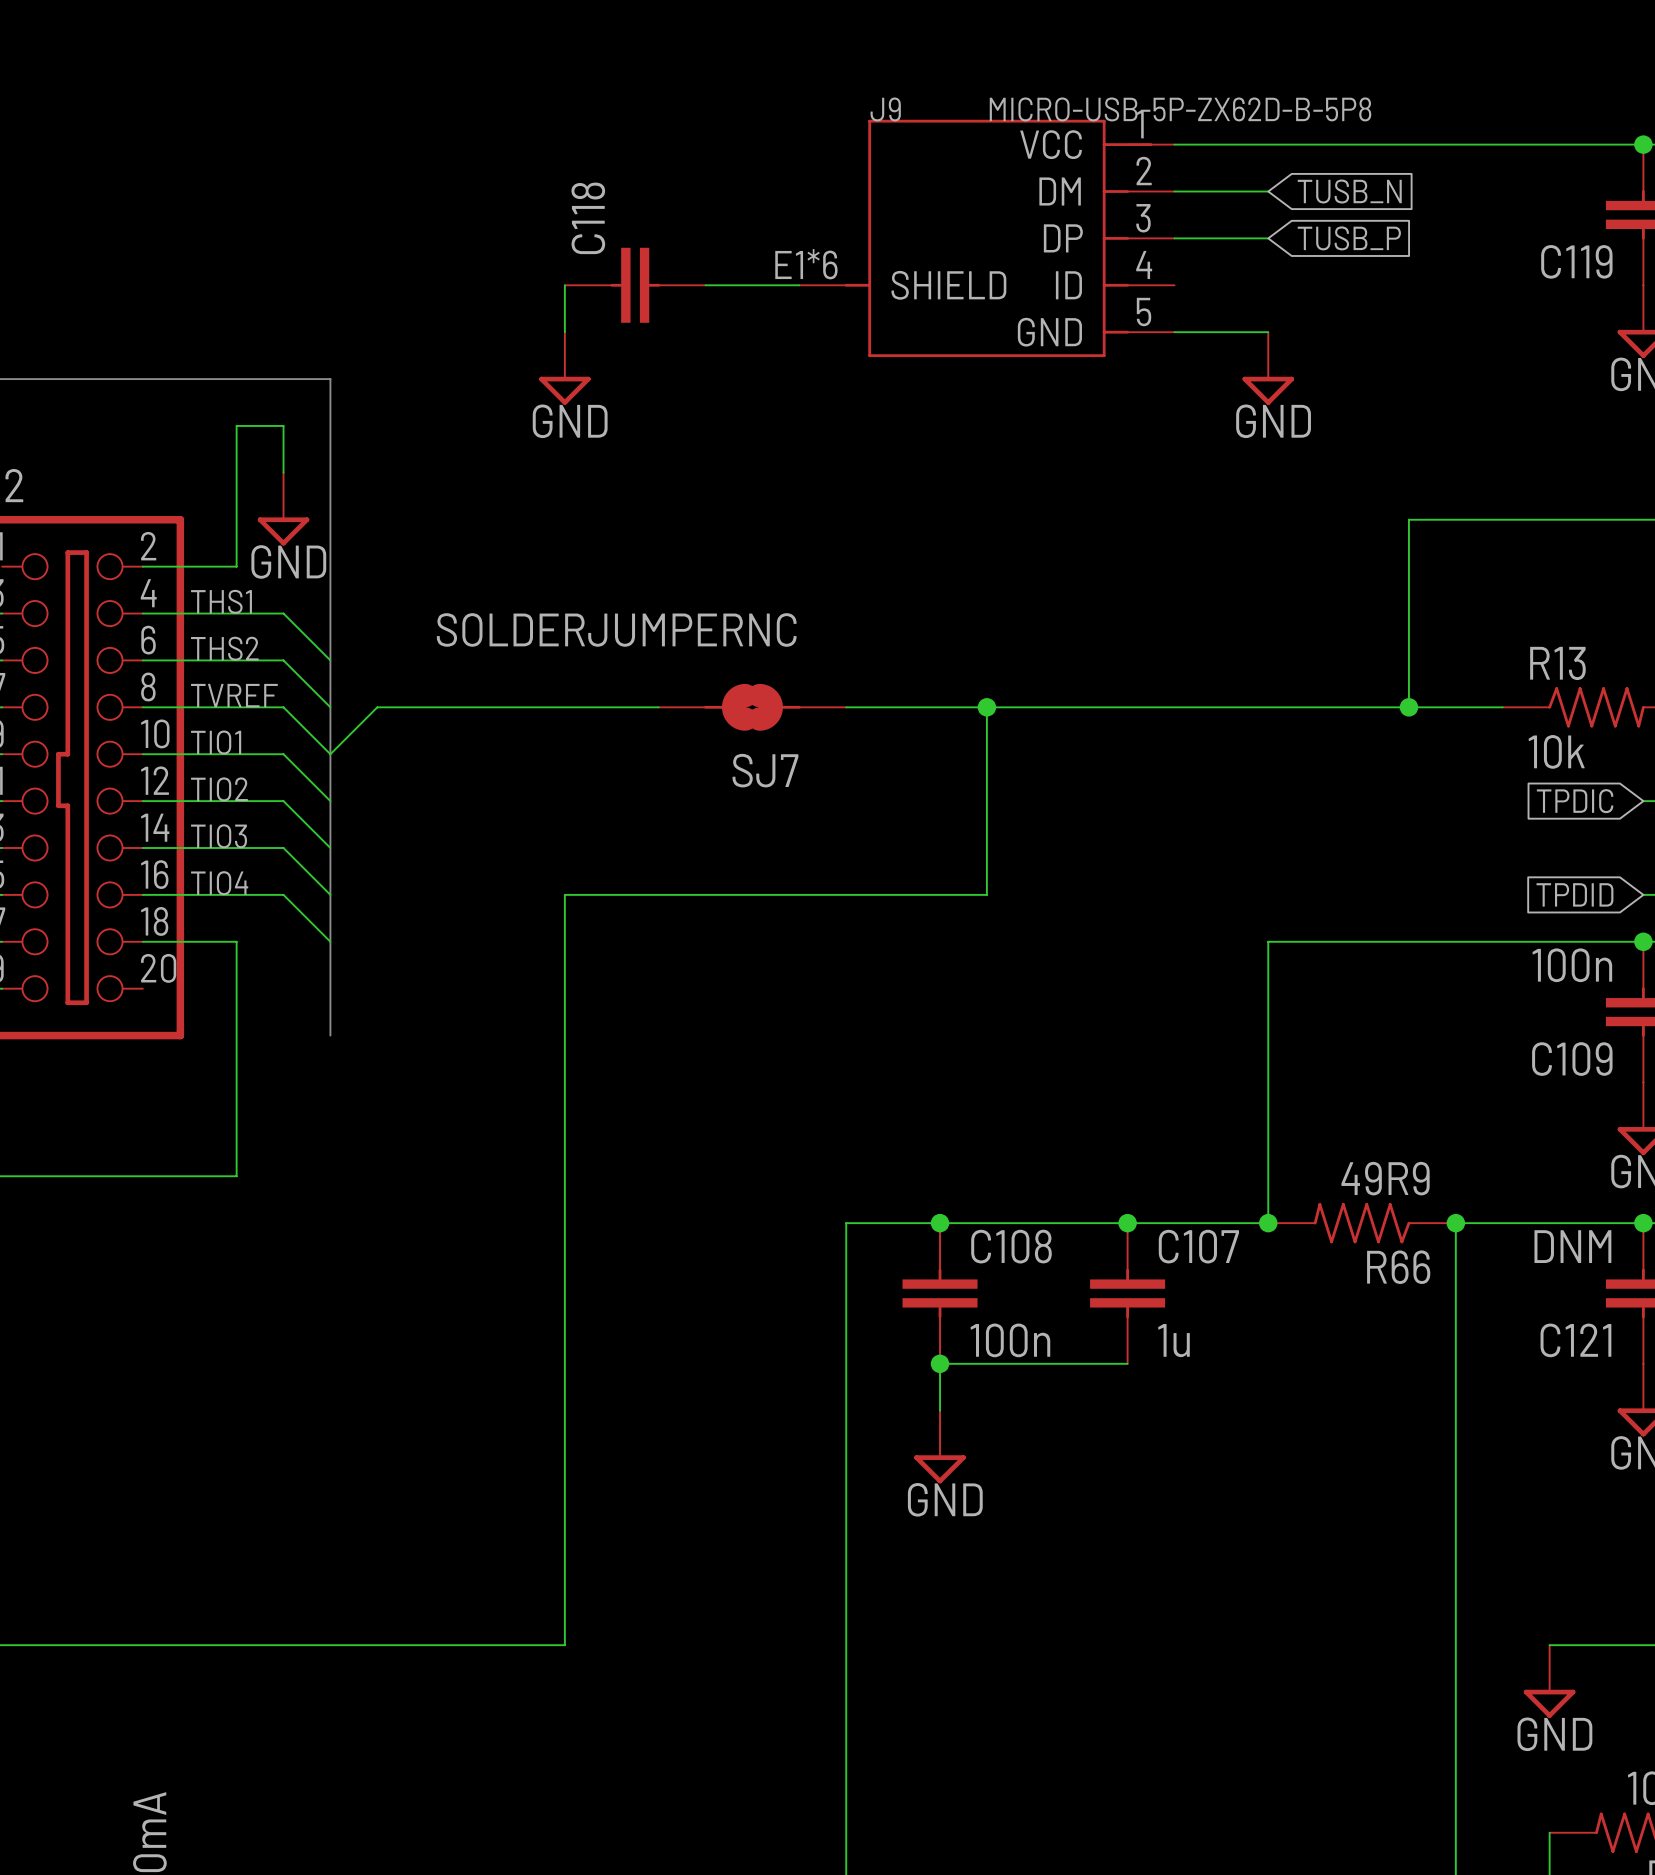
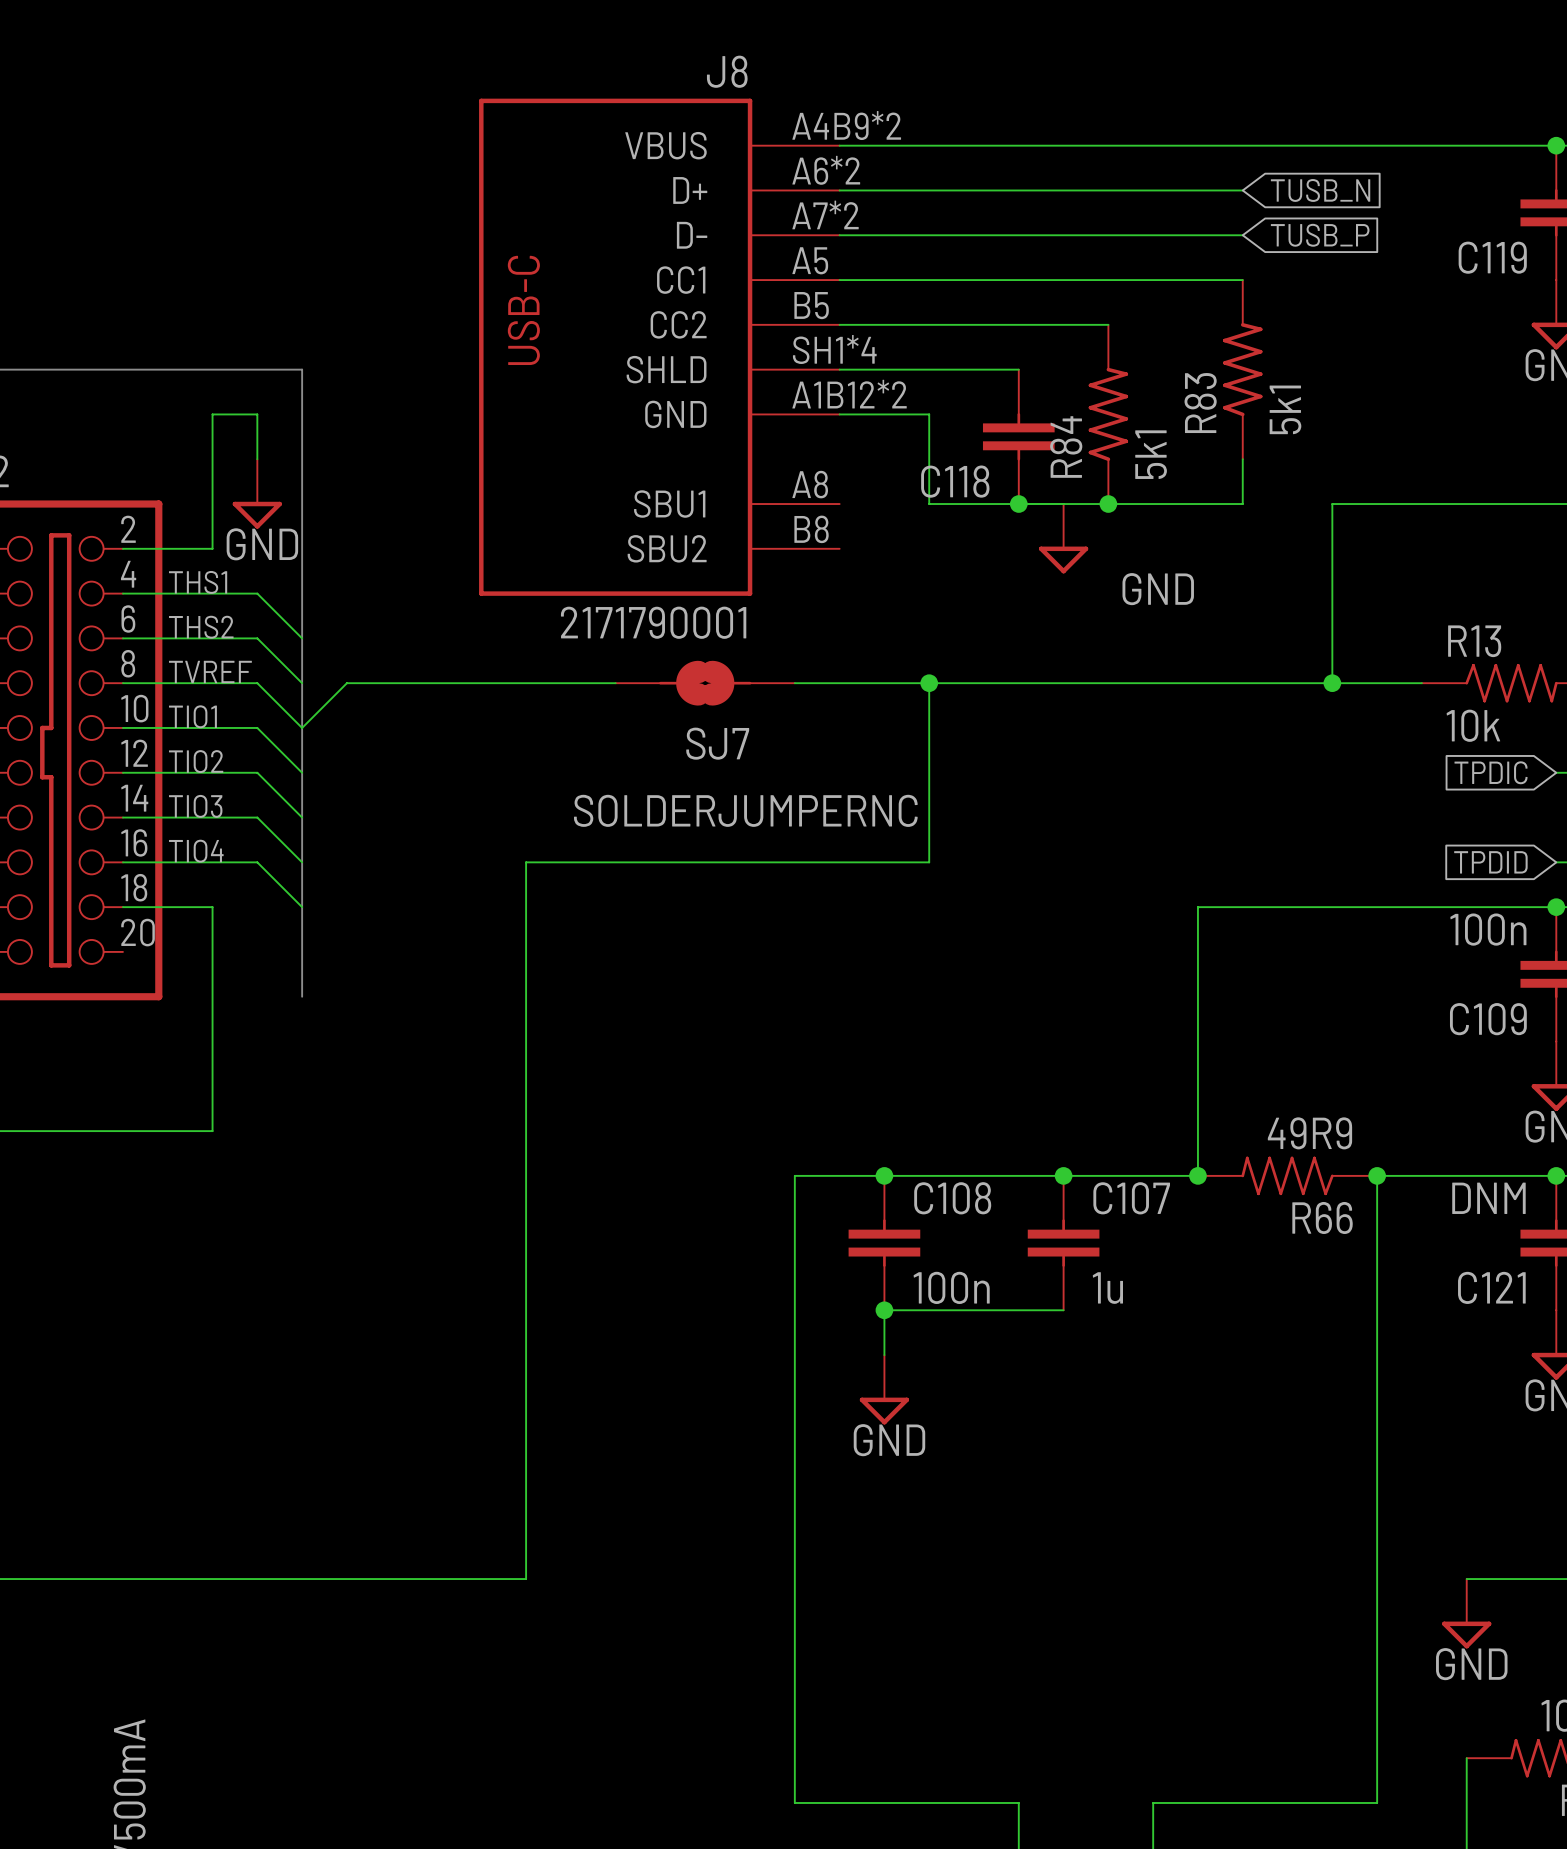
wire: none -> (839, 145) (1108, 145)
wire: none -> (839, 190) (1108, 190)
wire: none -> (1197, 190) (1242, 190)
global label position: TUSB_N (1349, 191) -> TUSB_N (1320, 190)
C118 name position: C118 (588, 218) -> C118 (955, 481)
wire: none -> (839, 235) (1108, 235)
J9: MICRO-USB-5P-ZX62D-B-5P8 (986, 238) -> none
wire: none -> (1197, 235) (1242, 235)
global label position: TUSB_P (1349, 238) -> TUSB_P (1320, 235)
wire: (564, 285) (564, 332) -> none
C118 rotation: 0° (635, 285) -> 90° clockwise (1018, 436)
C118 position: (635, 285) -> (1018, 436)
wire: (705, 285) (799, 285) -> none
wire: none -> (839, 280) (1242, 280)
wire: (1174, 332) (1268, 332) -> (1108, 324) (839, 324)
J8: none -> 2171790001 (659, 347)
power symbol: GND (564, 368) -> none
power symbol position: GND (1268, 368) -> GND (1063, 538)
wire: none -> (839, 369) (1018, 369)
R83: none -> 5k1 (1242, 369)
power symbol text position: GND (1273, 421) -> GND (1158, 589)
wire: none -> (839, 414) (929, 414) (929, 504) (1242, 504) (1242, 459)
R84: none -> 5k1 (1108, 414)
junction: none -> (1018, 504)
junction: none -> (1108, 504)
SJ7 value position: SOLDERJUMPERNC (616, 629) -> SOLDERJUMPERNC (745, 810)

